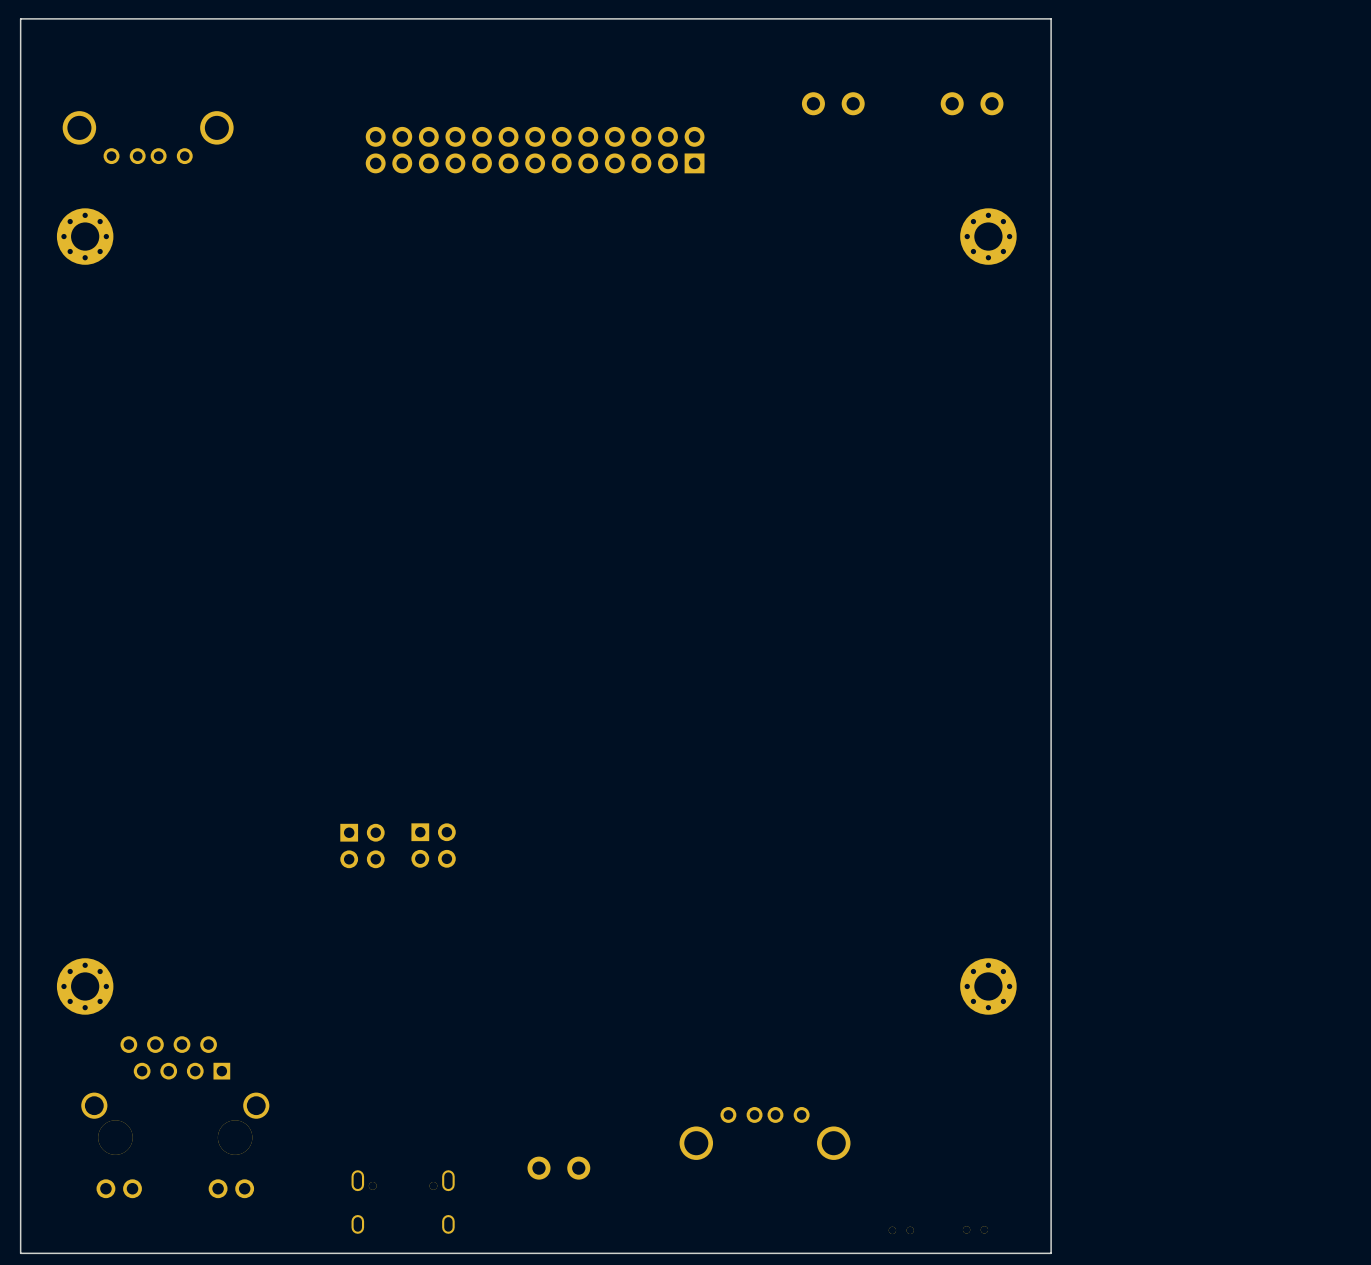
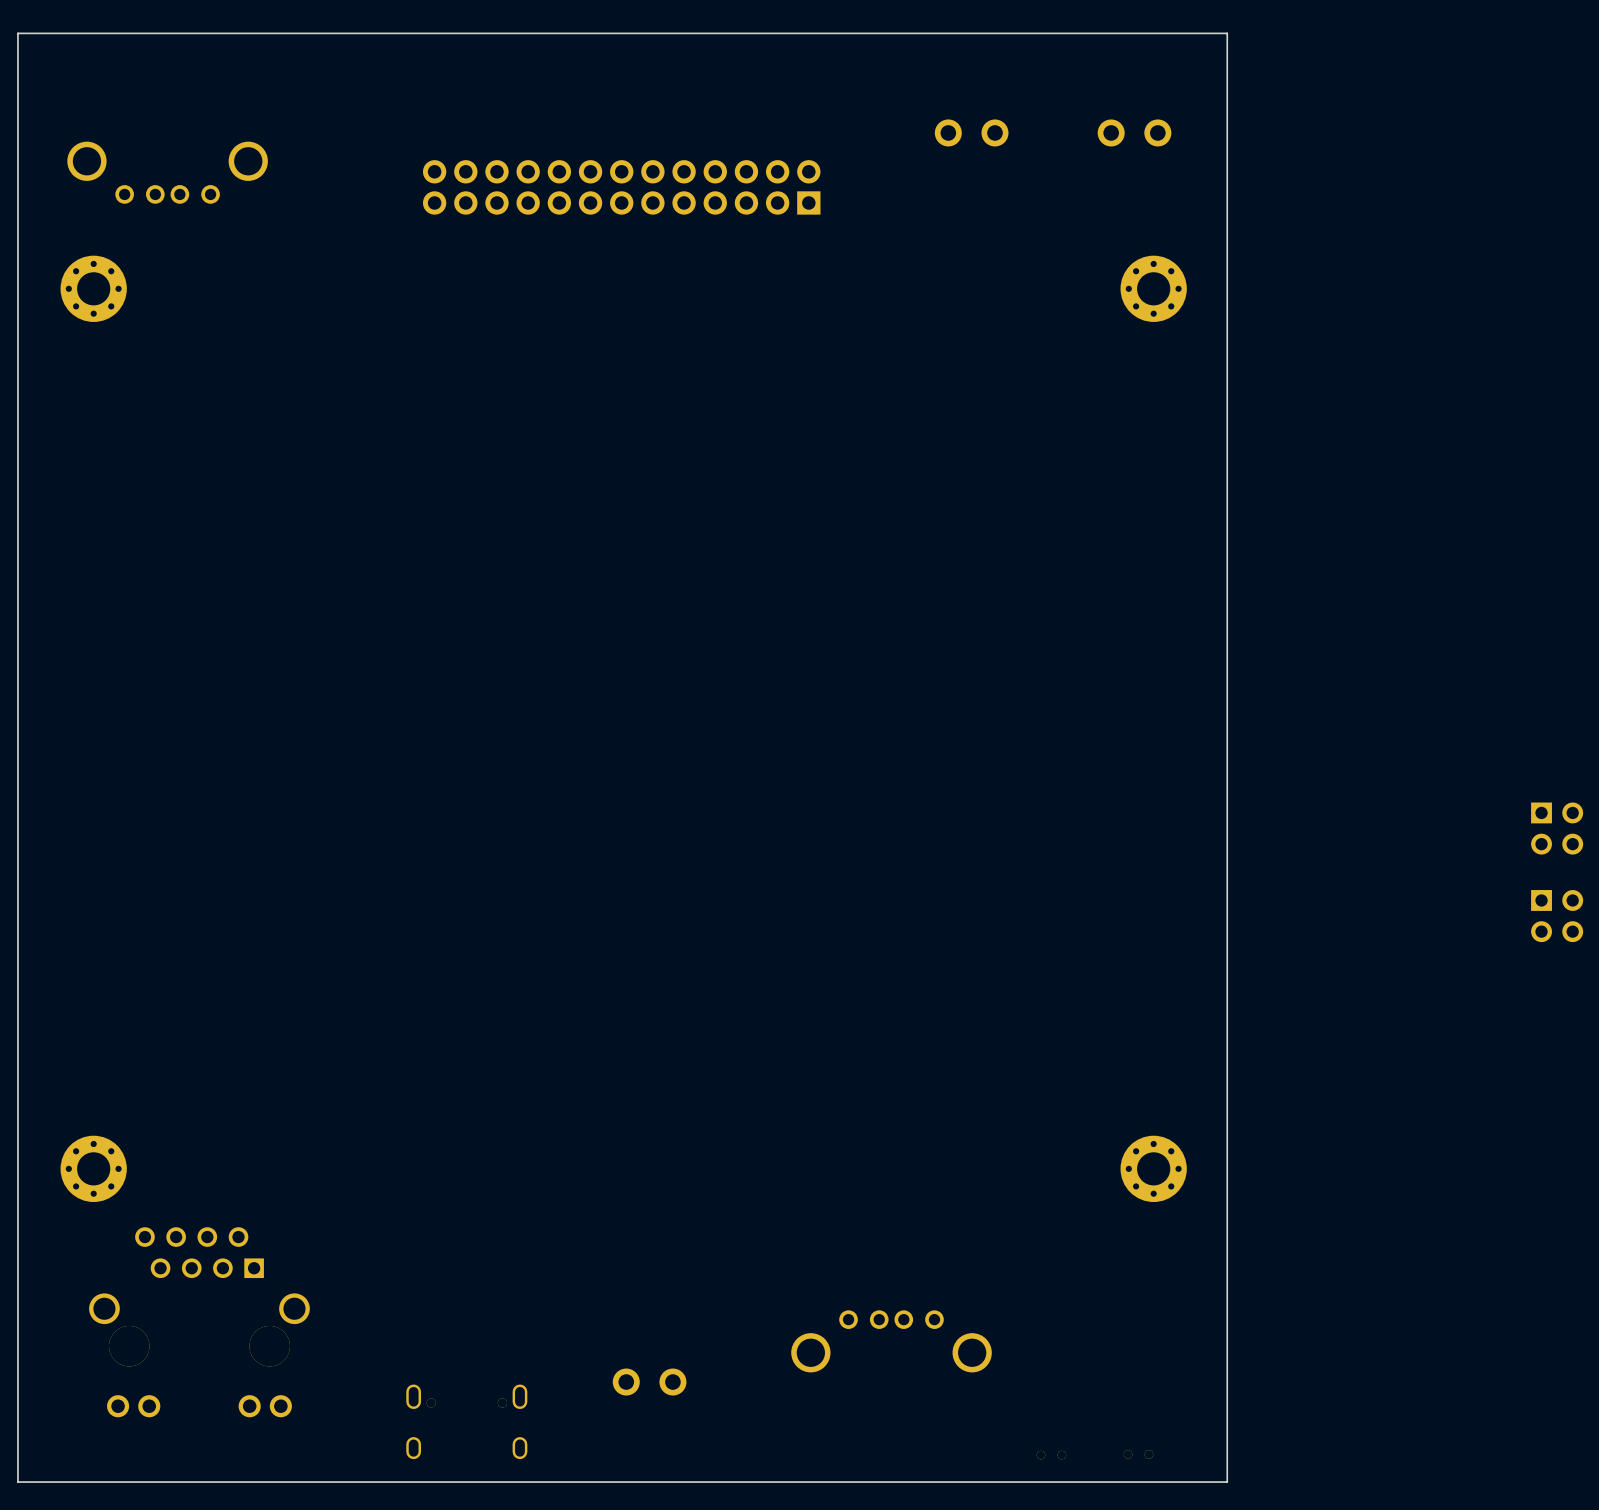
part: none -> (1557, 828)
part: none -> (1557, 916)
part: (433, 845) -> none
part: (362, 846) -> none

